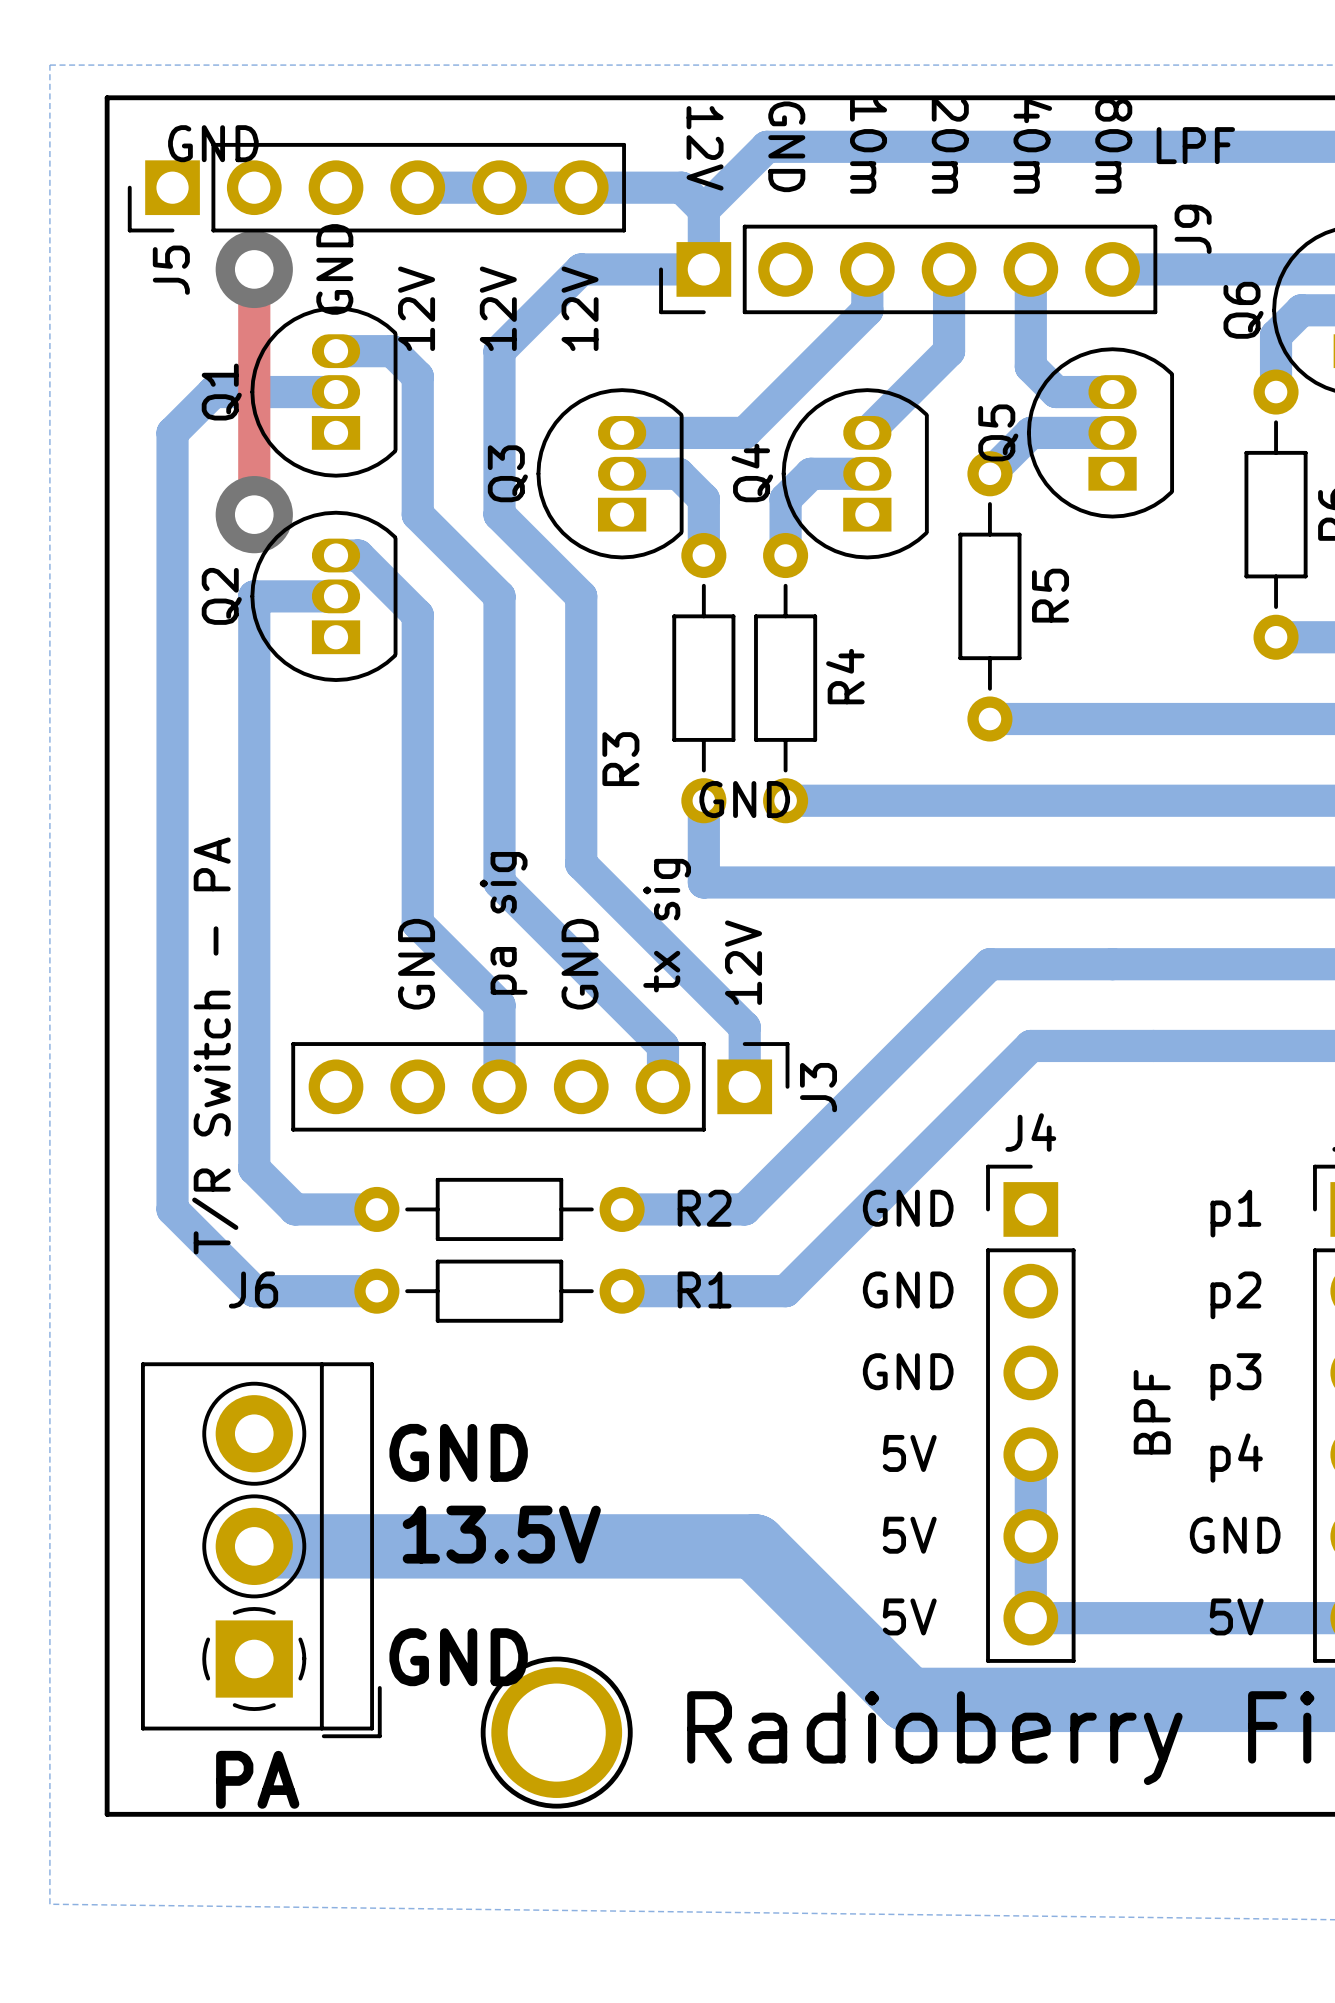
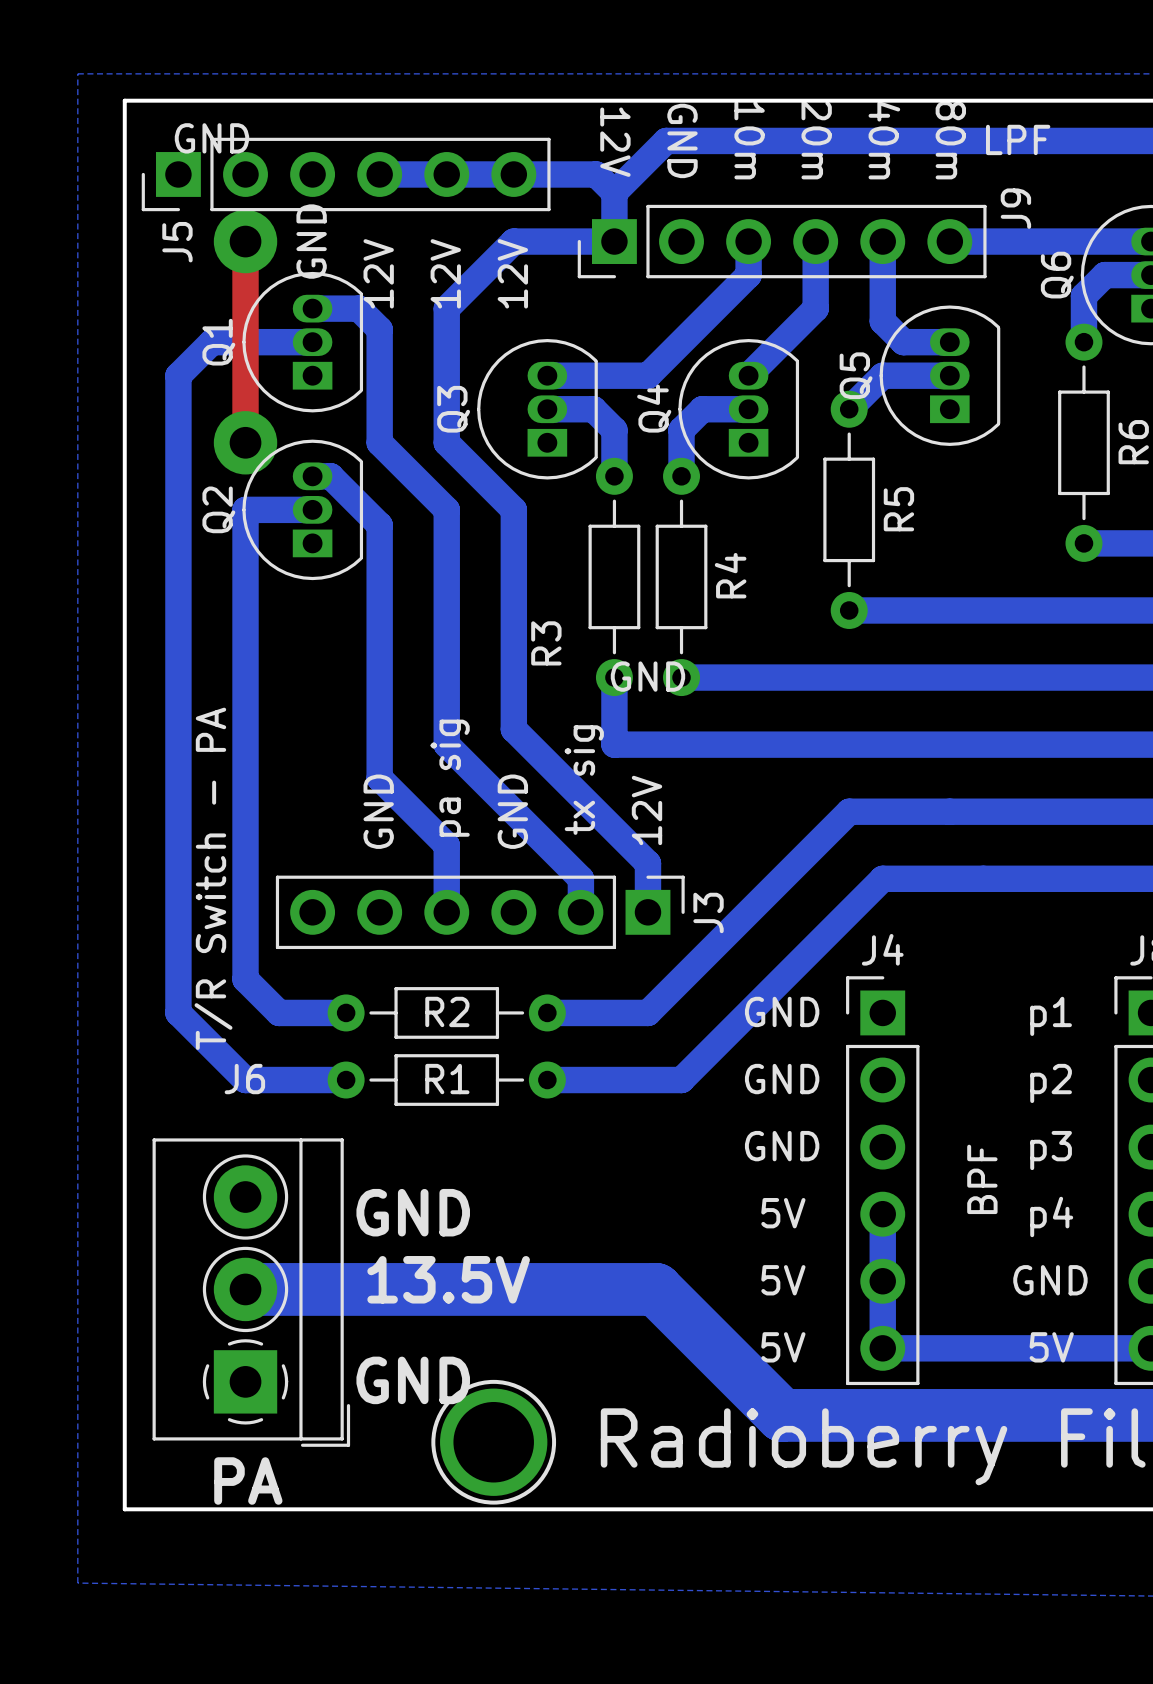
R2 name position: R2 (704, 1208) -> R2 (447, 1011)
R1 name position: R1 (704, 1289) -> R1 (447, 1079)

